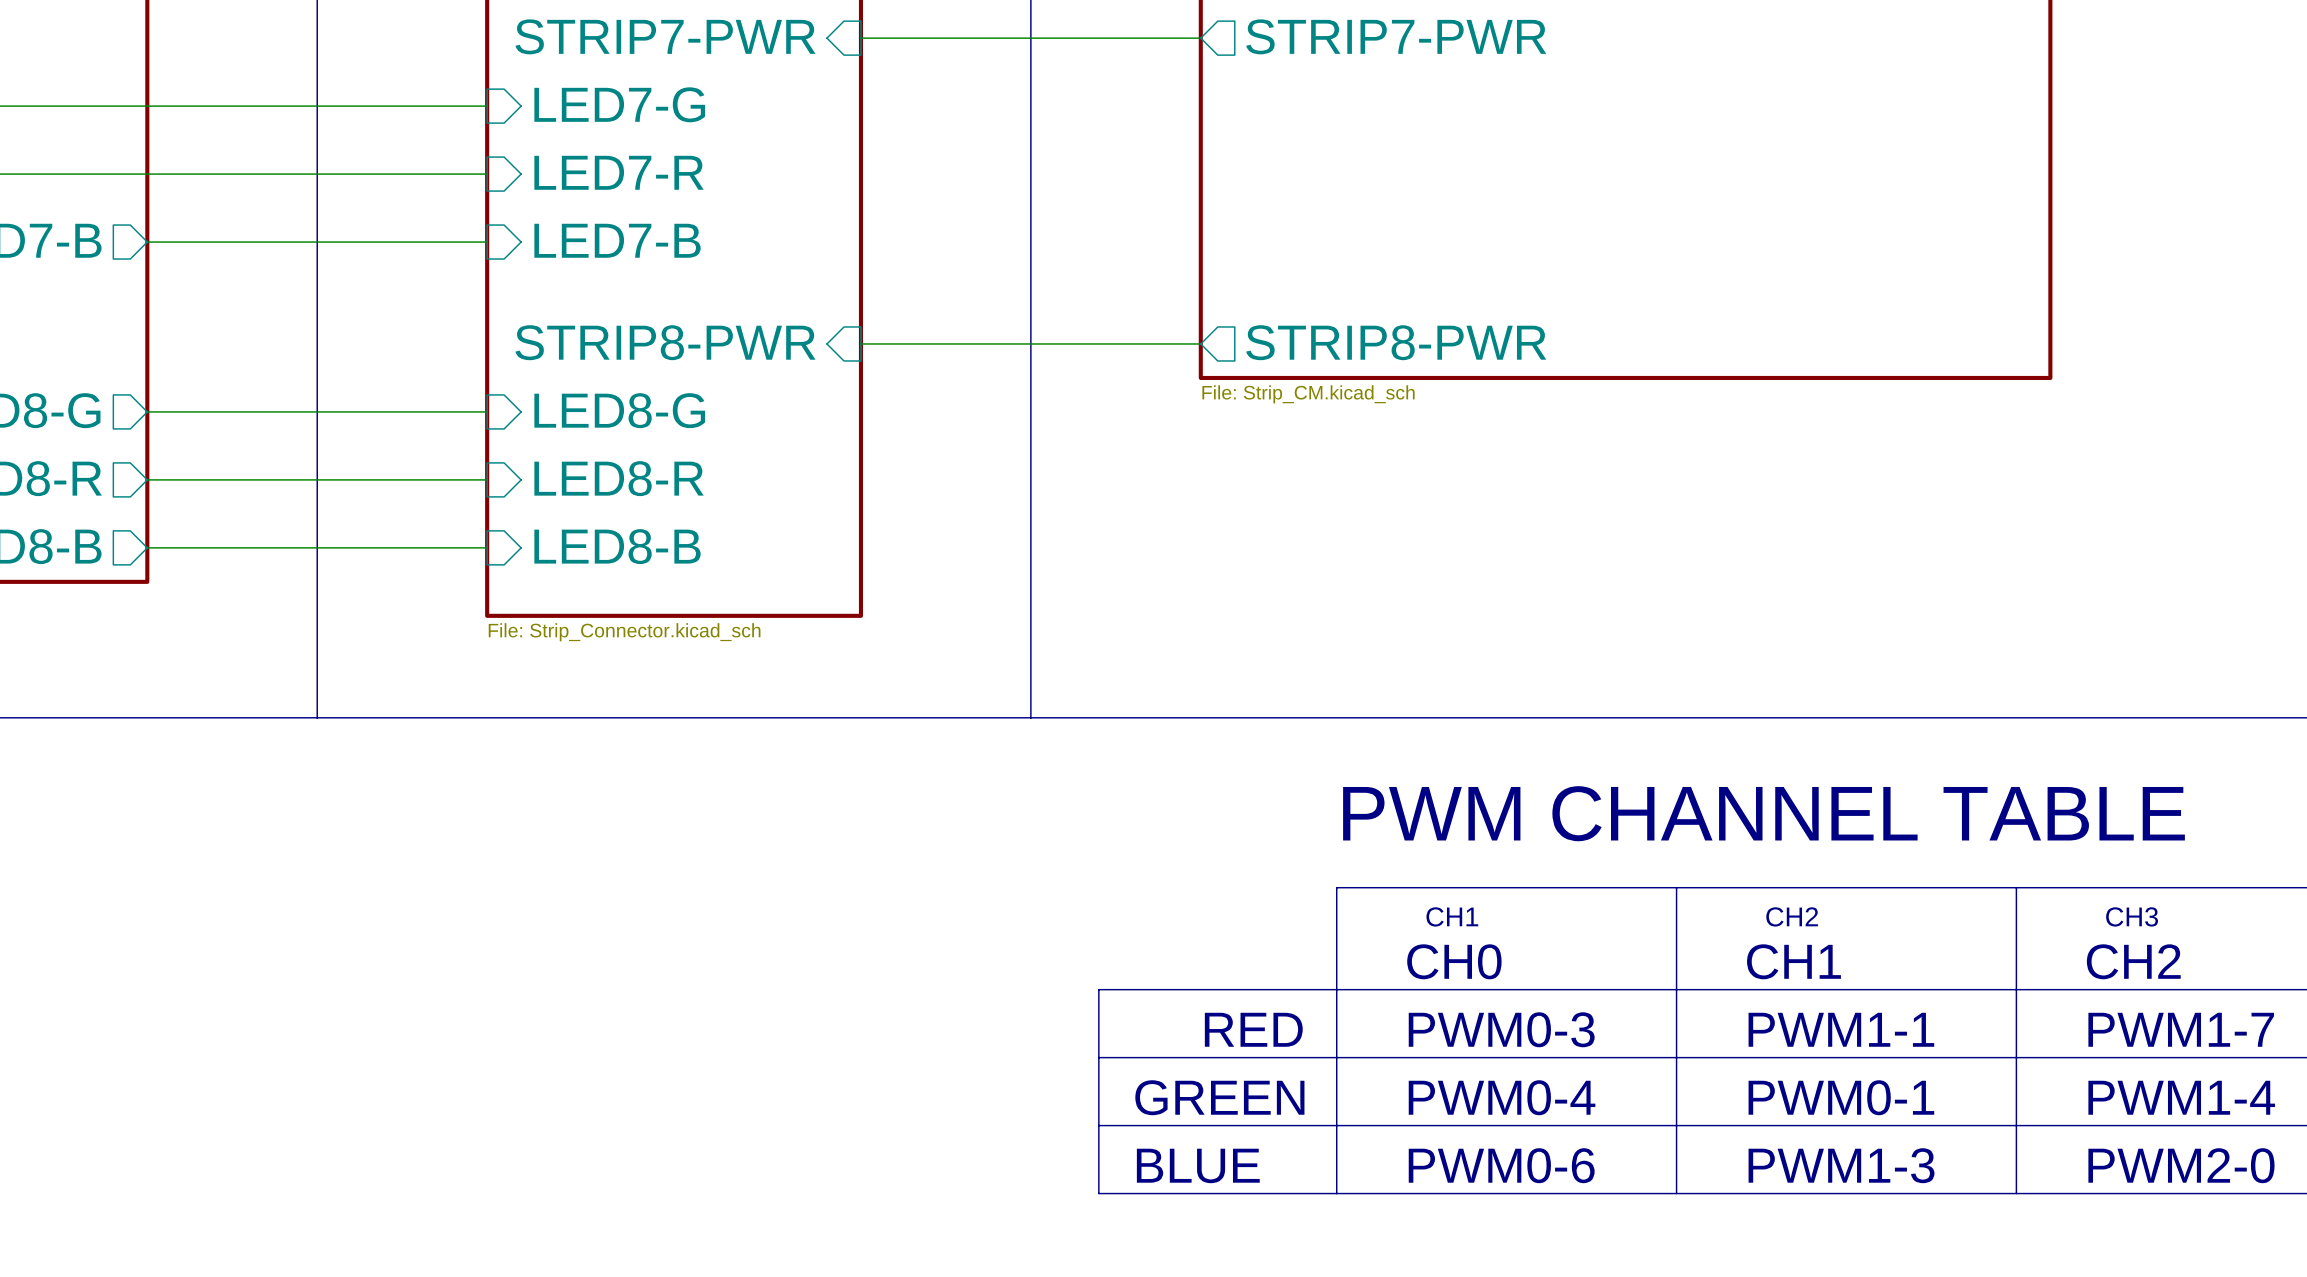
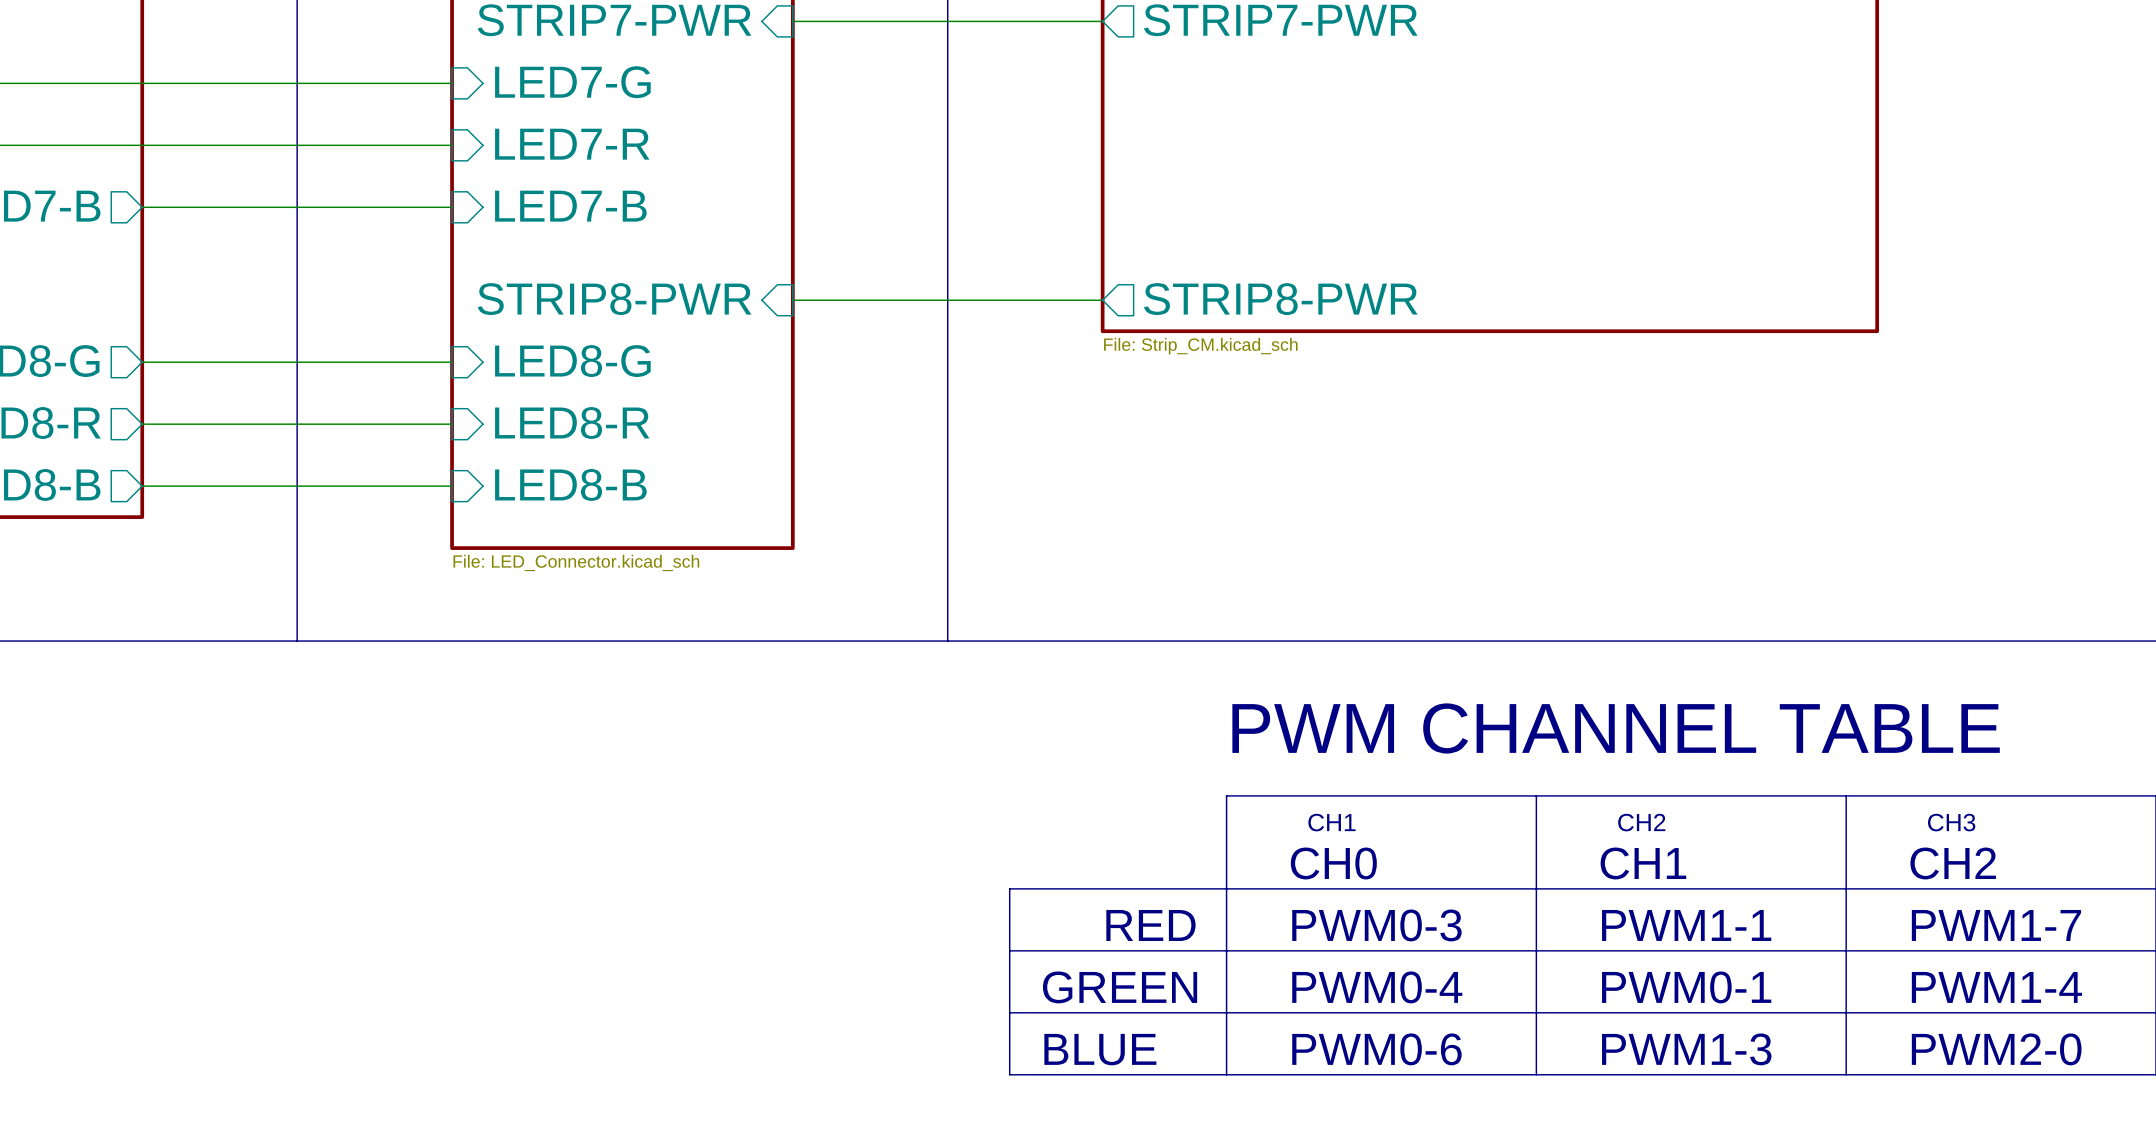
sheet value: File: Strip_Connector.kicad_sch (624, 632) -> File: LED_Connector.kicad_sch (576, 562)

